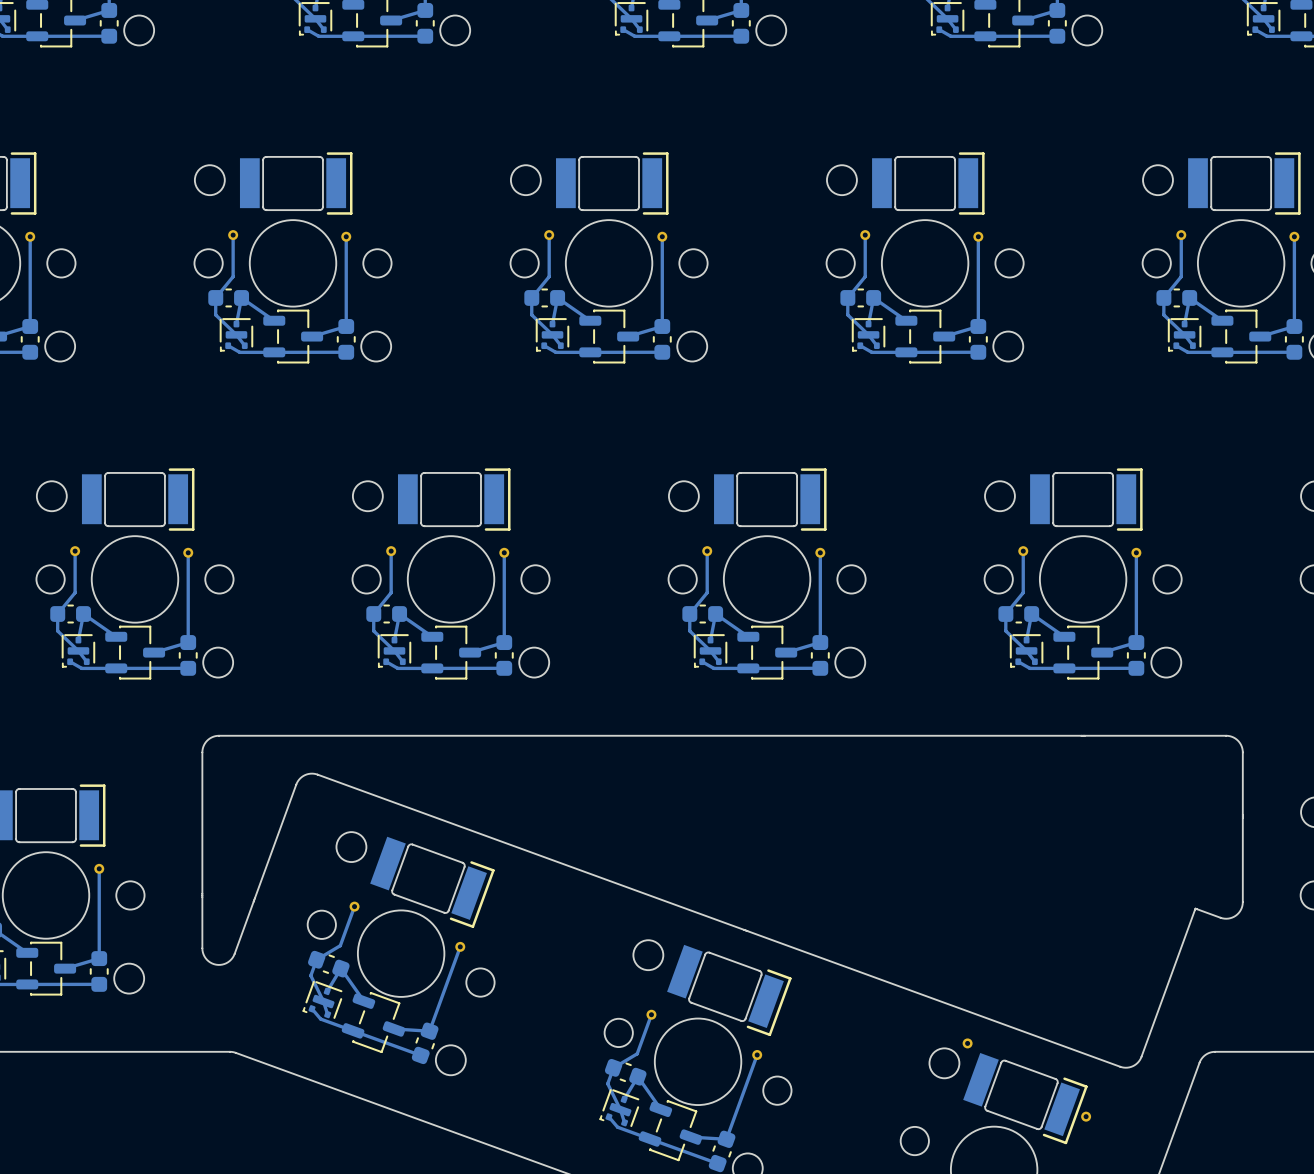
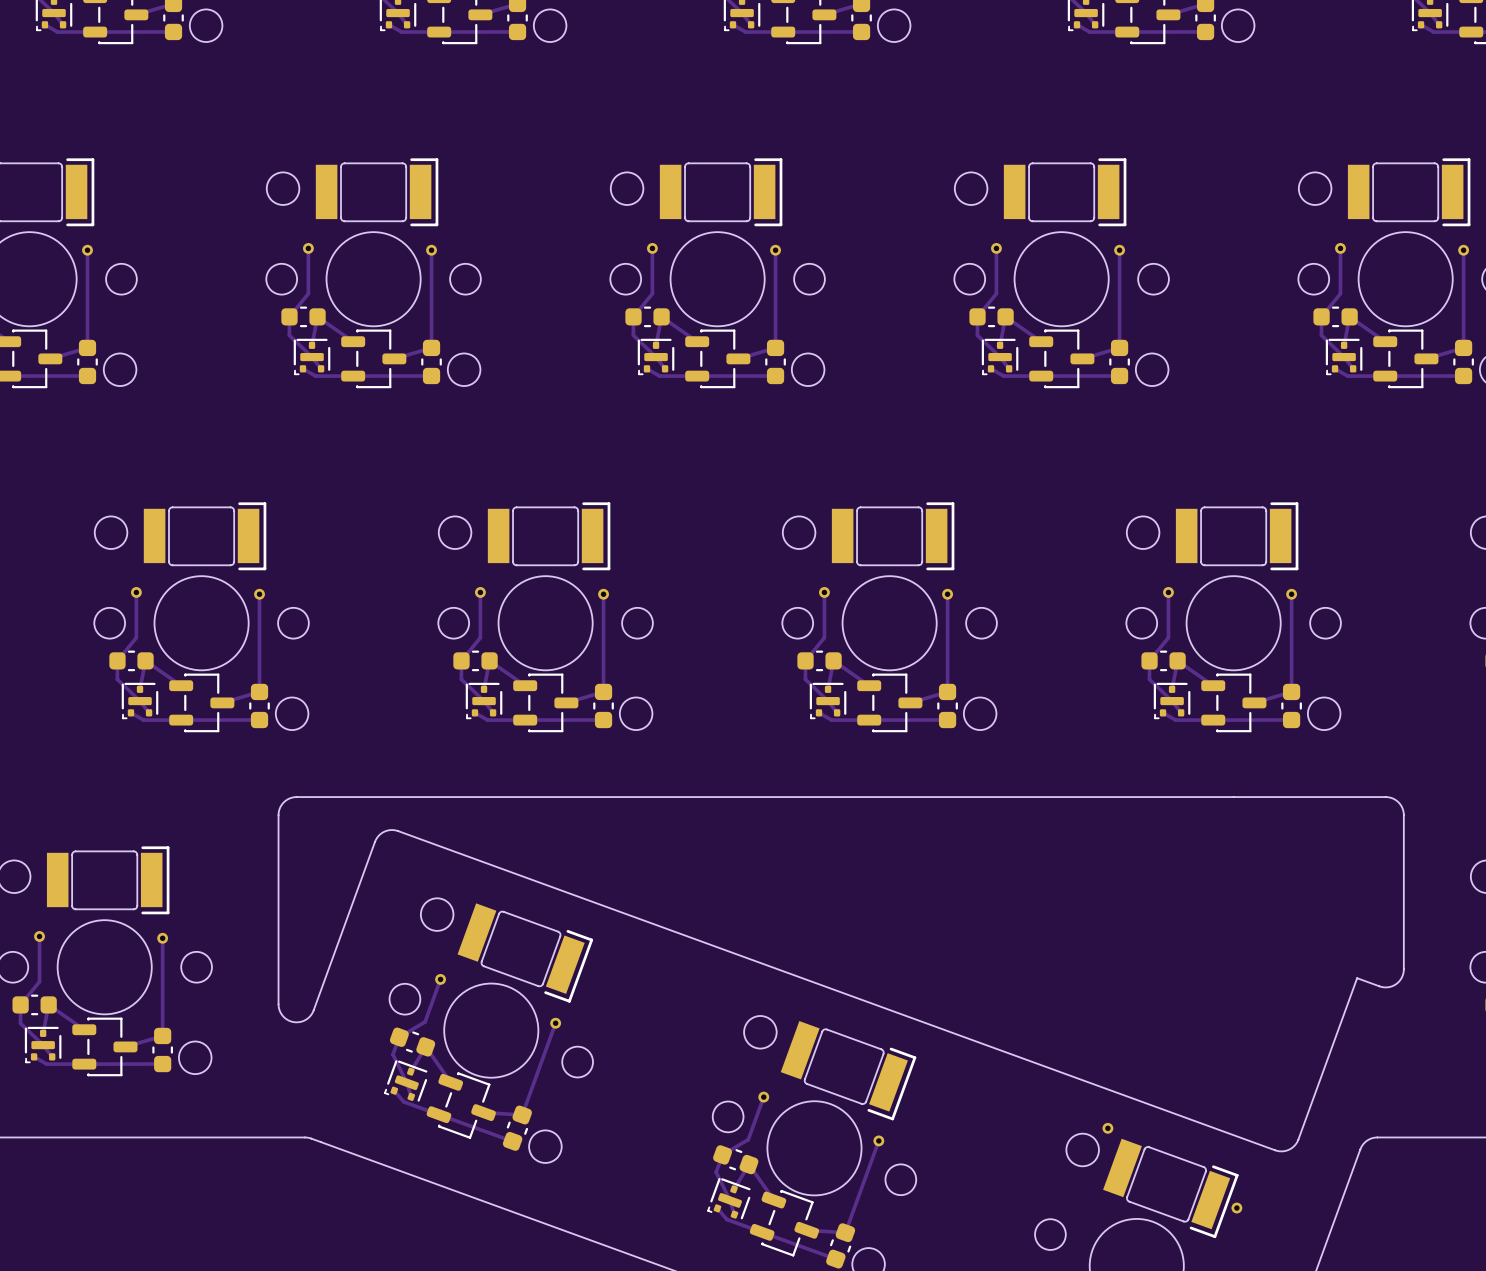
board edge: (1194, 910) (1195, 908) (1228, 918) (1237, 914) (1242, 906) (1242, 750) (1237, 740) (1229, 736) (219, 735) (208, 739) (203, 746) (202, 948) (205, 958) (214, 964) (226, 963) (233, 955) (297, 782) (303, 776) (314, 773) (1120, 1066) (1127, 1067) (1134, 1065) (1142, 1053) -> (1355, 983) (1357, 978) (1381, 986) (1390, 986) (1399, 981) (1403, 973) (1403, 813) (1398, 802) (1389, 797) (296, 797) (285, 801) (279, 809) (278, 1004) (282, 1014) (291, 1021) (304, 1020) (312, 1012) (375, 839) (382, 832) (393, 830) (1275, 1150) (1289, 1149) (1298, 1139)

